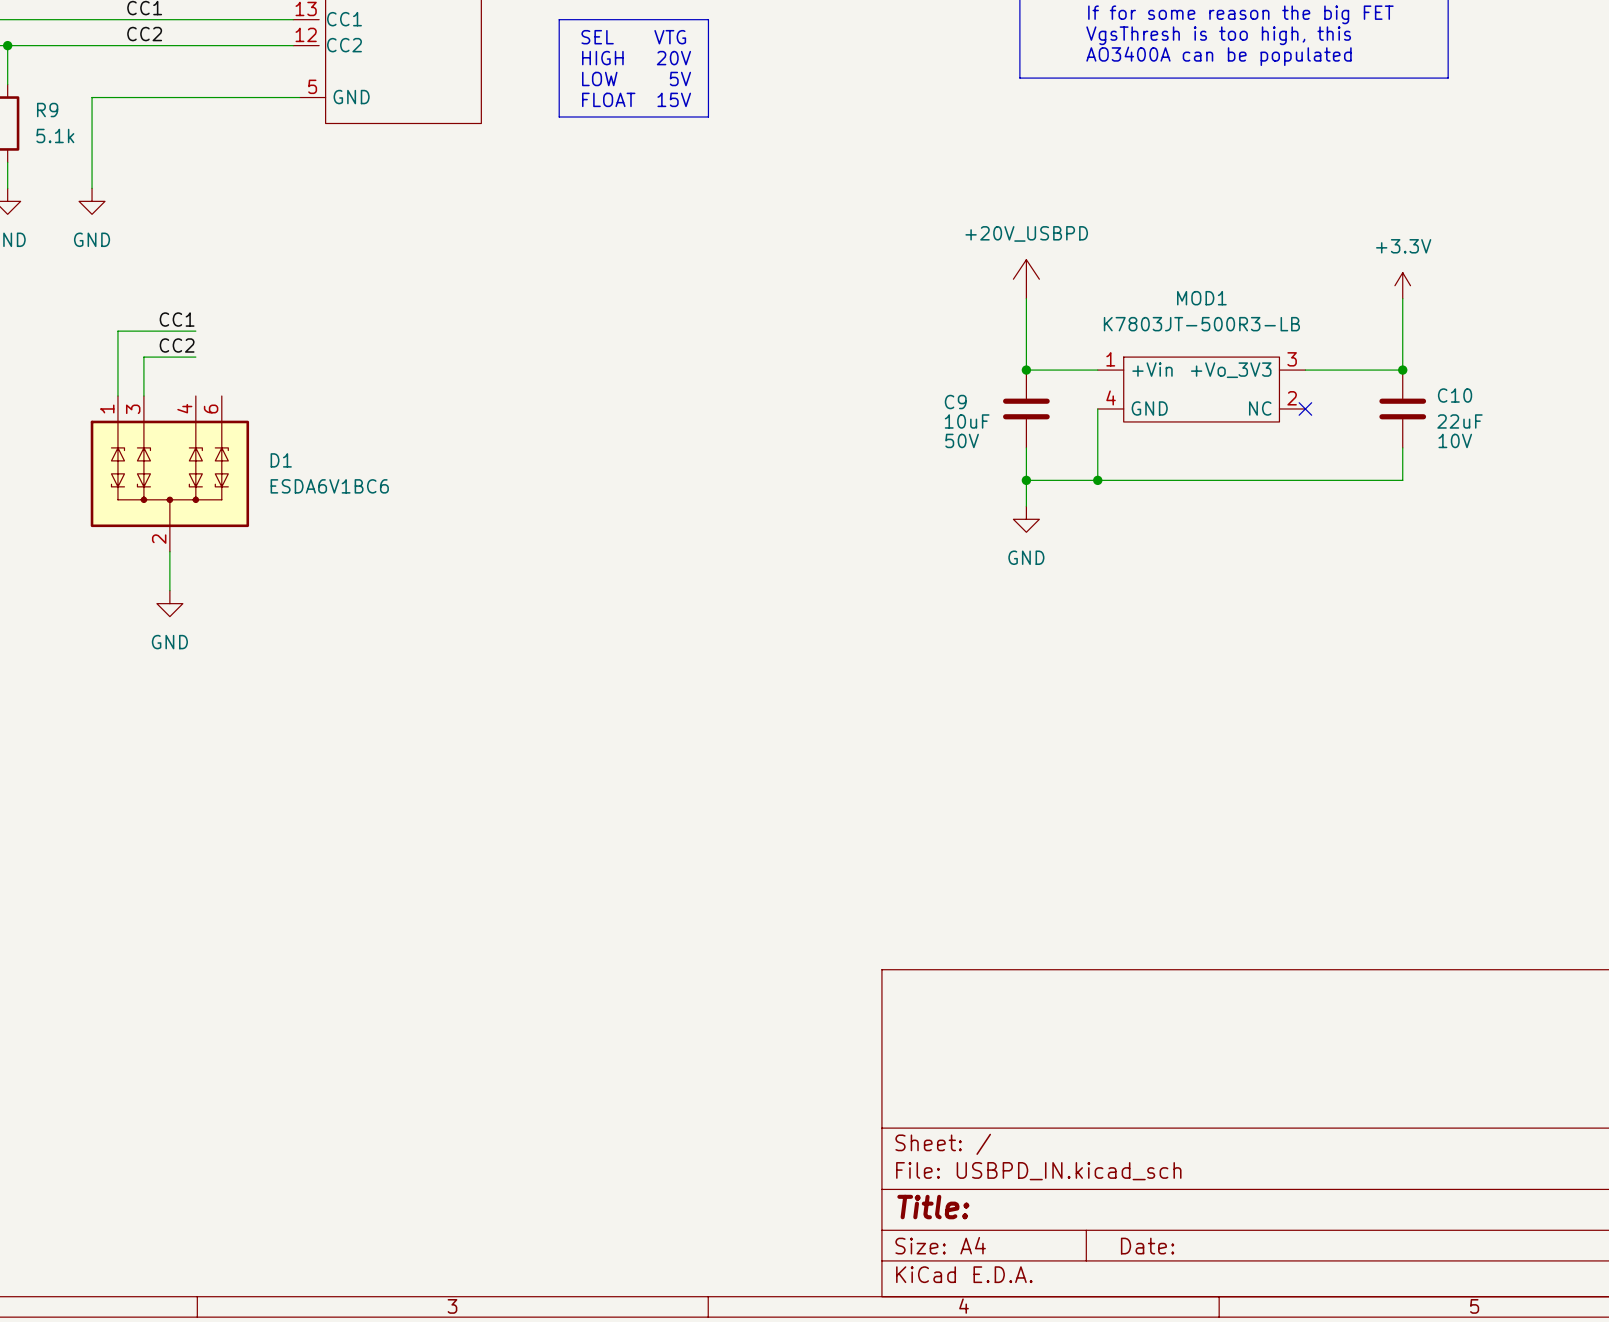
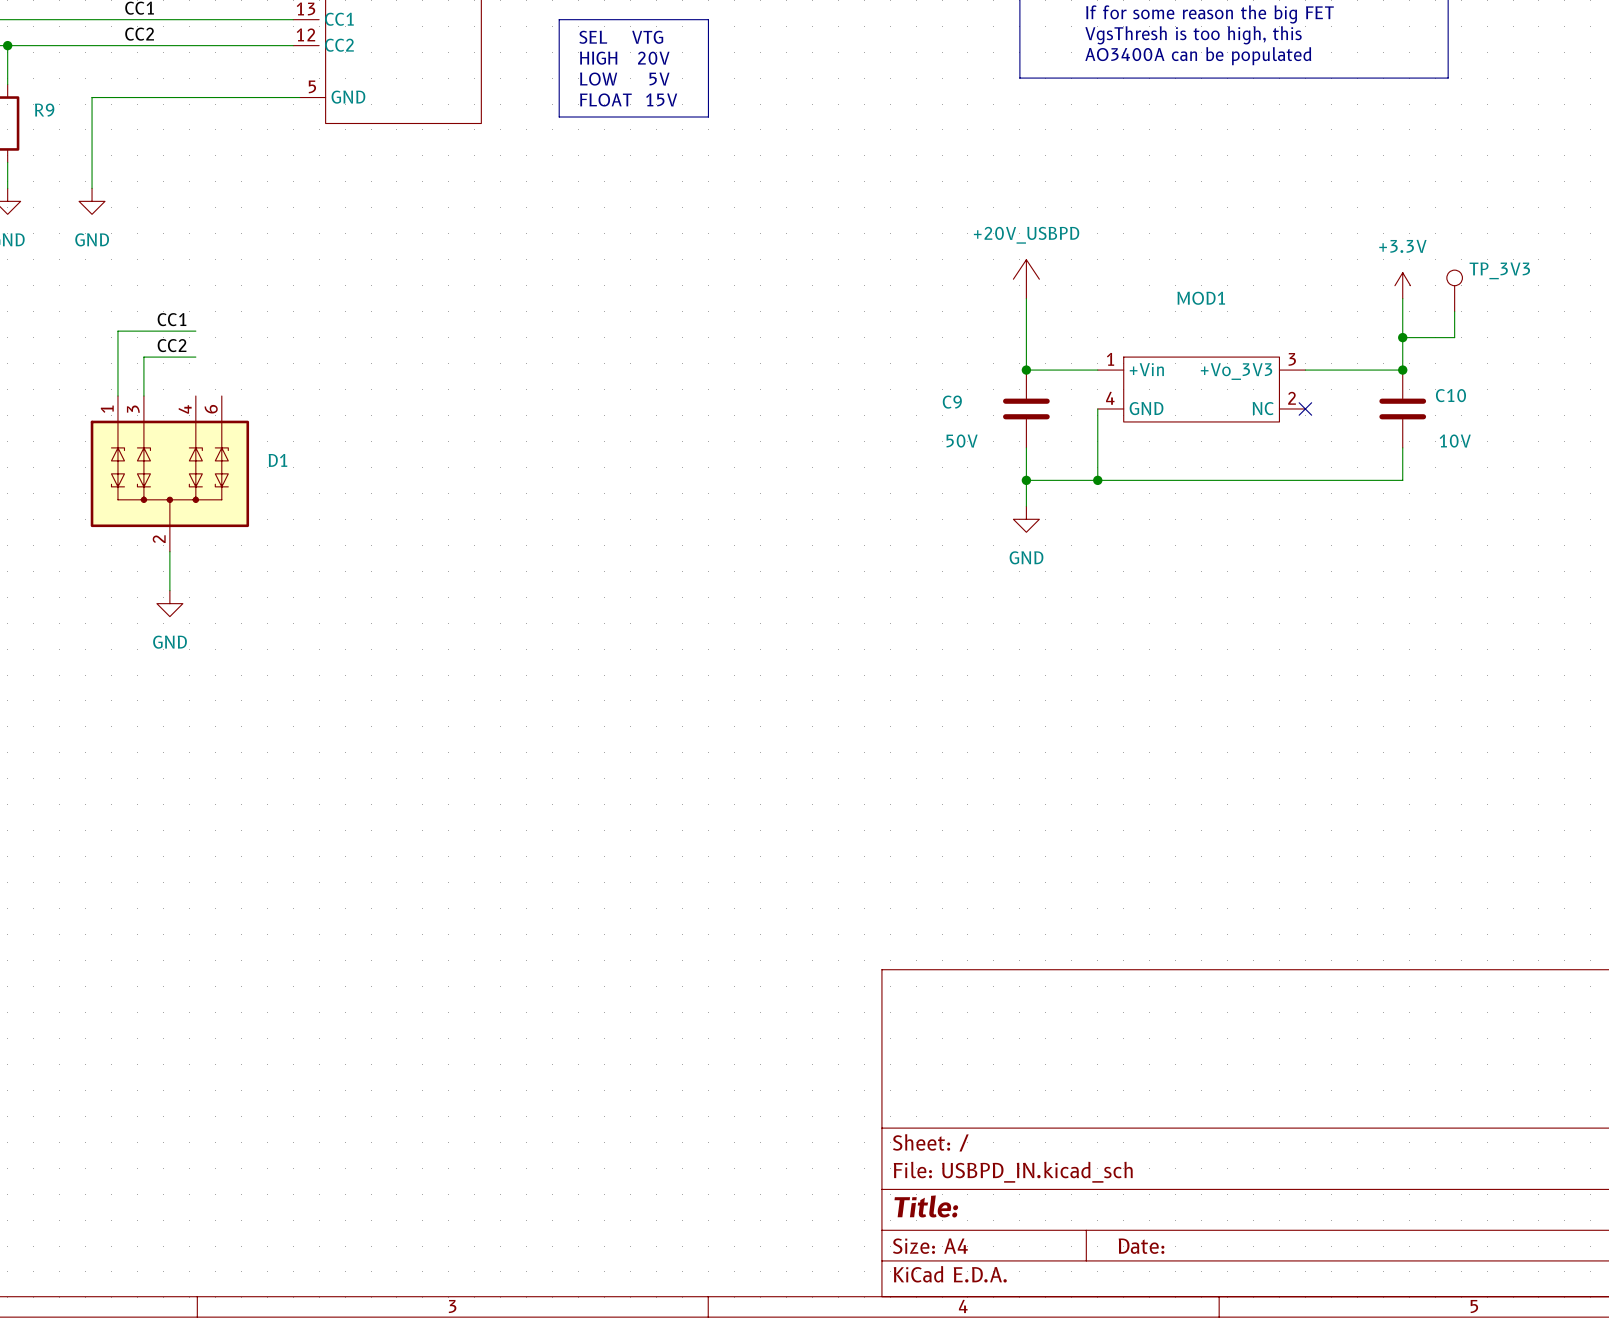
R9 value: 5.1k (55, 135) -> none
TP_3V3: none -> (1454, 290)
wire: none -> (1454, 311) (1454, 337) (1402, 337)
MOD1 value: K7803JT-500R3-LB (1201, 324) -> none
junction: none -> (1402, 337)
C9 value: 10uF (967, 421) -> none
C10 value: 22uF (1459, 421) -> none
D1 value: ESDA6V1BC6 (329, 486) -> none

